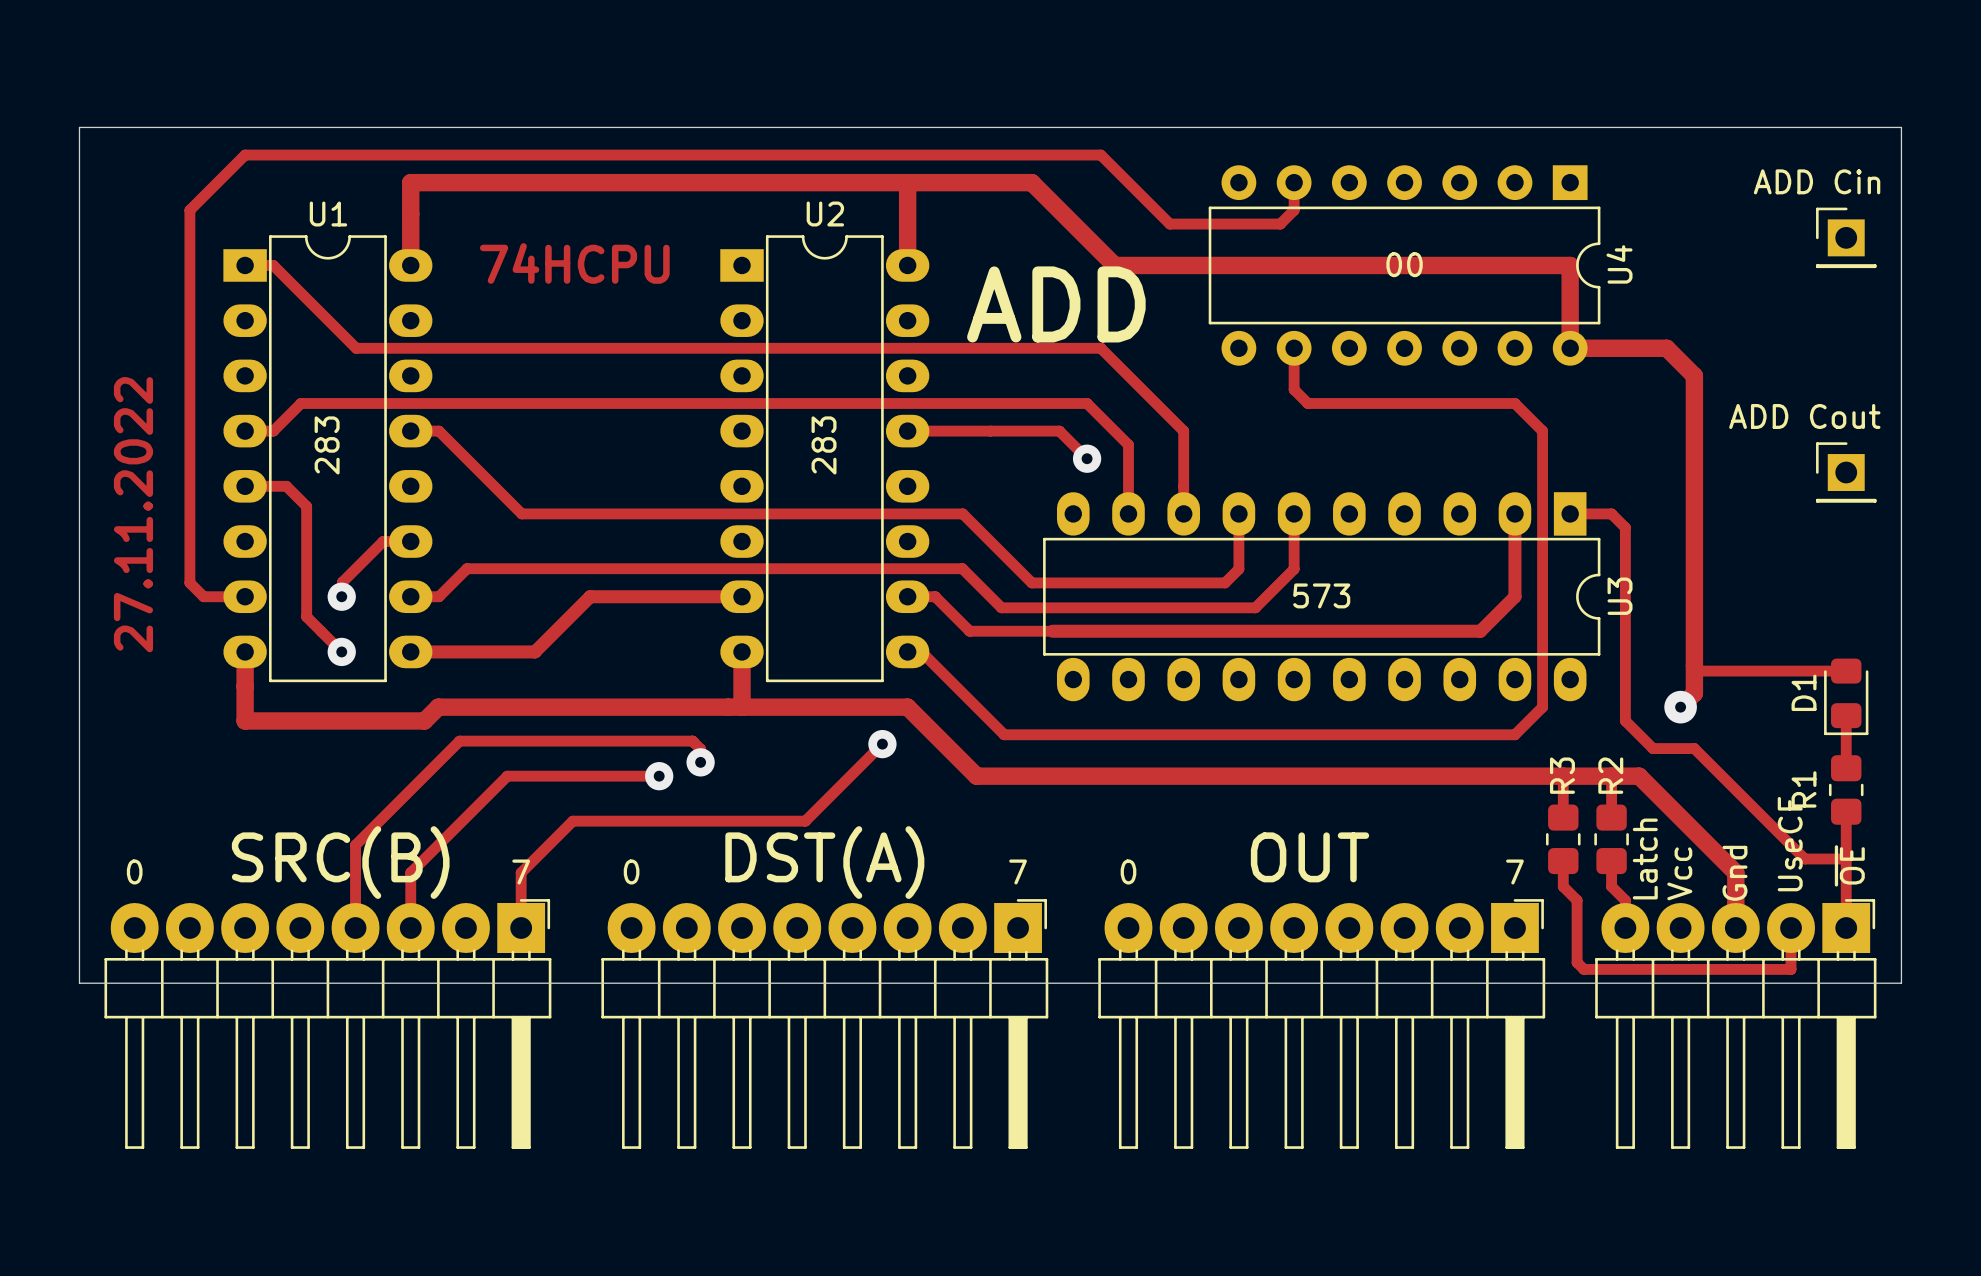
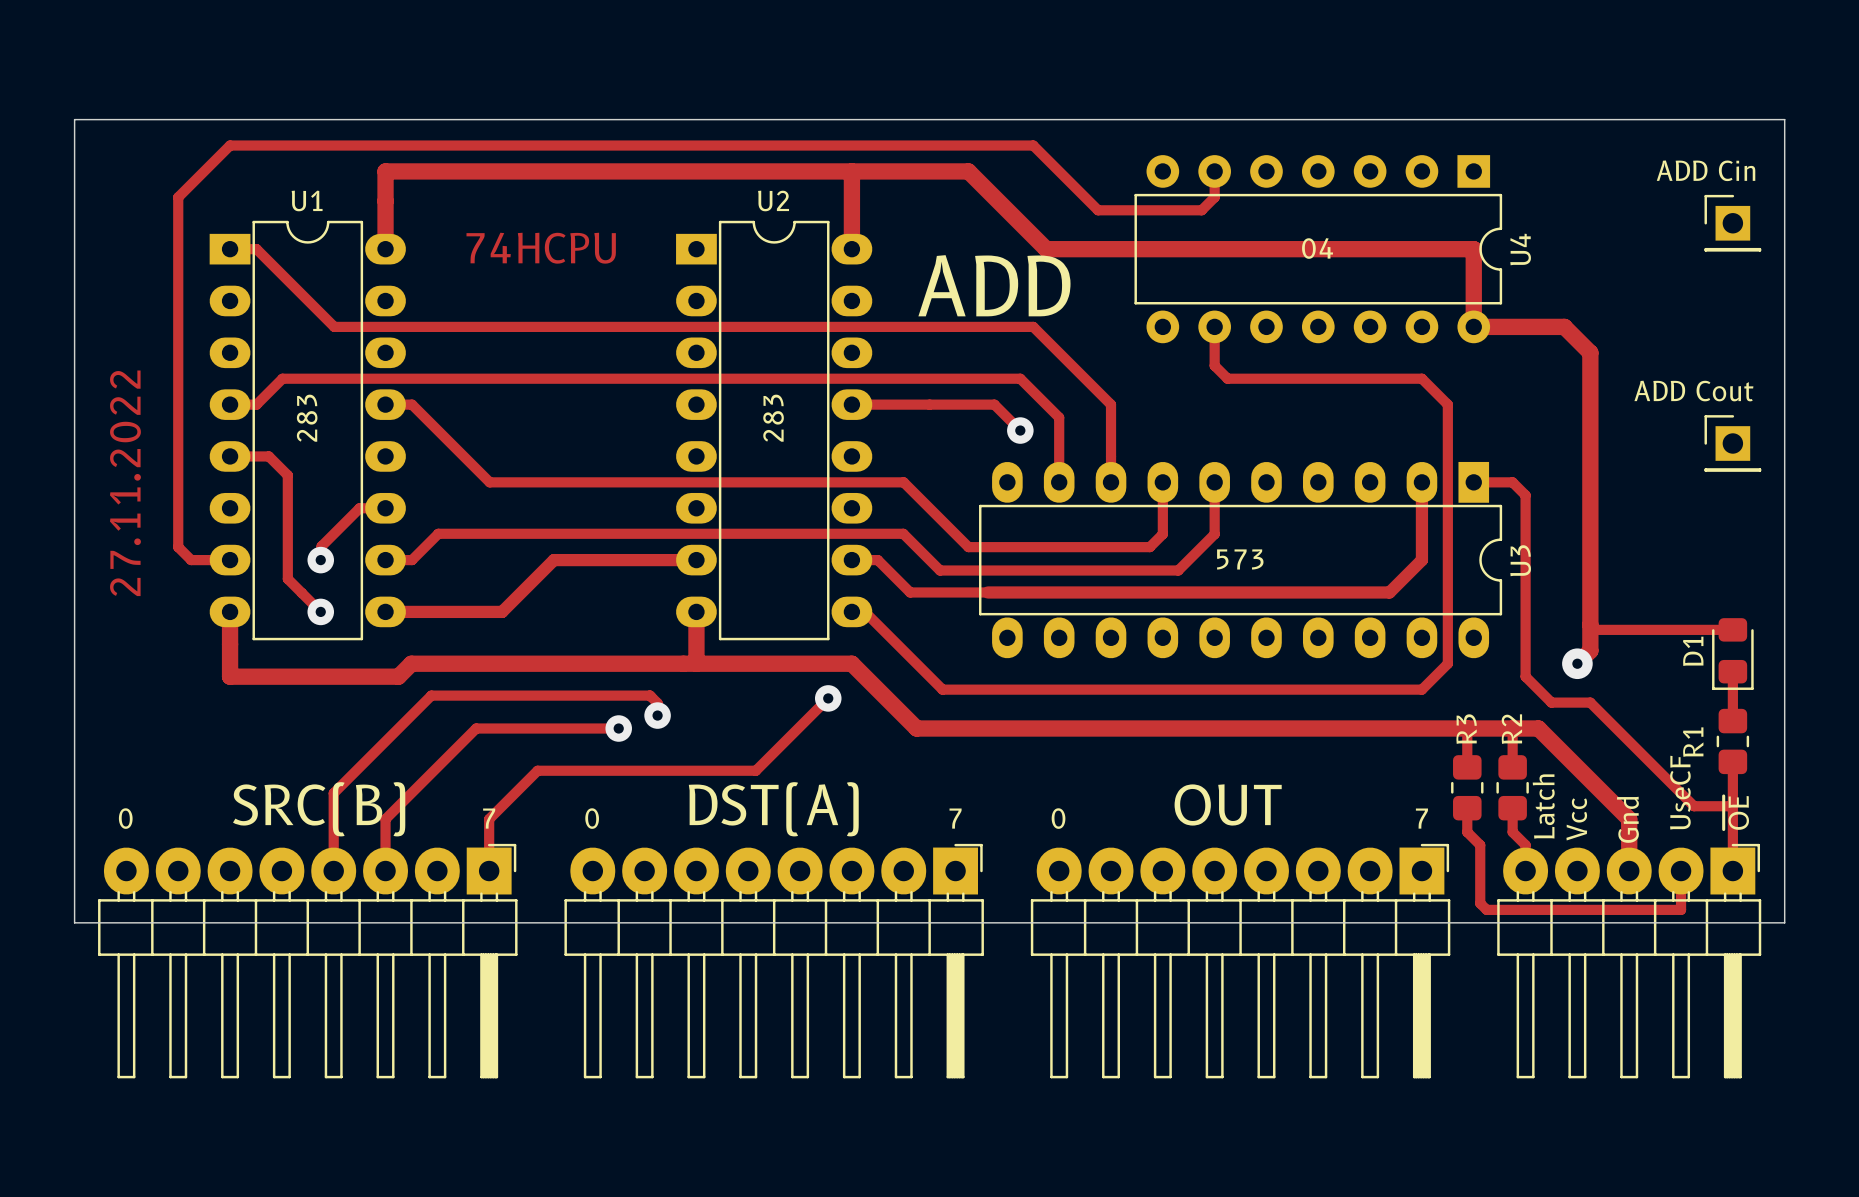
text: 00 (1404, 264) -> 04 (1317, 248)

